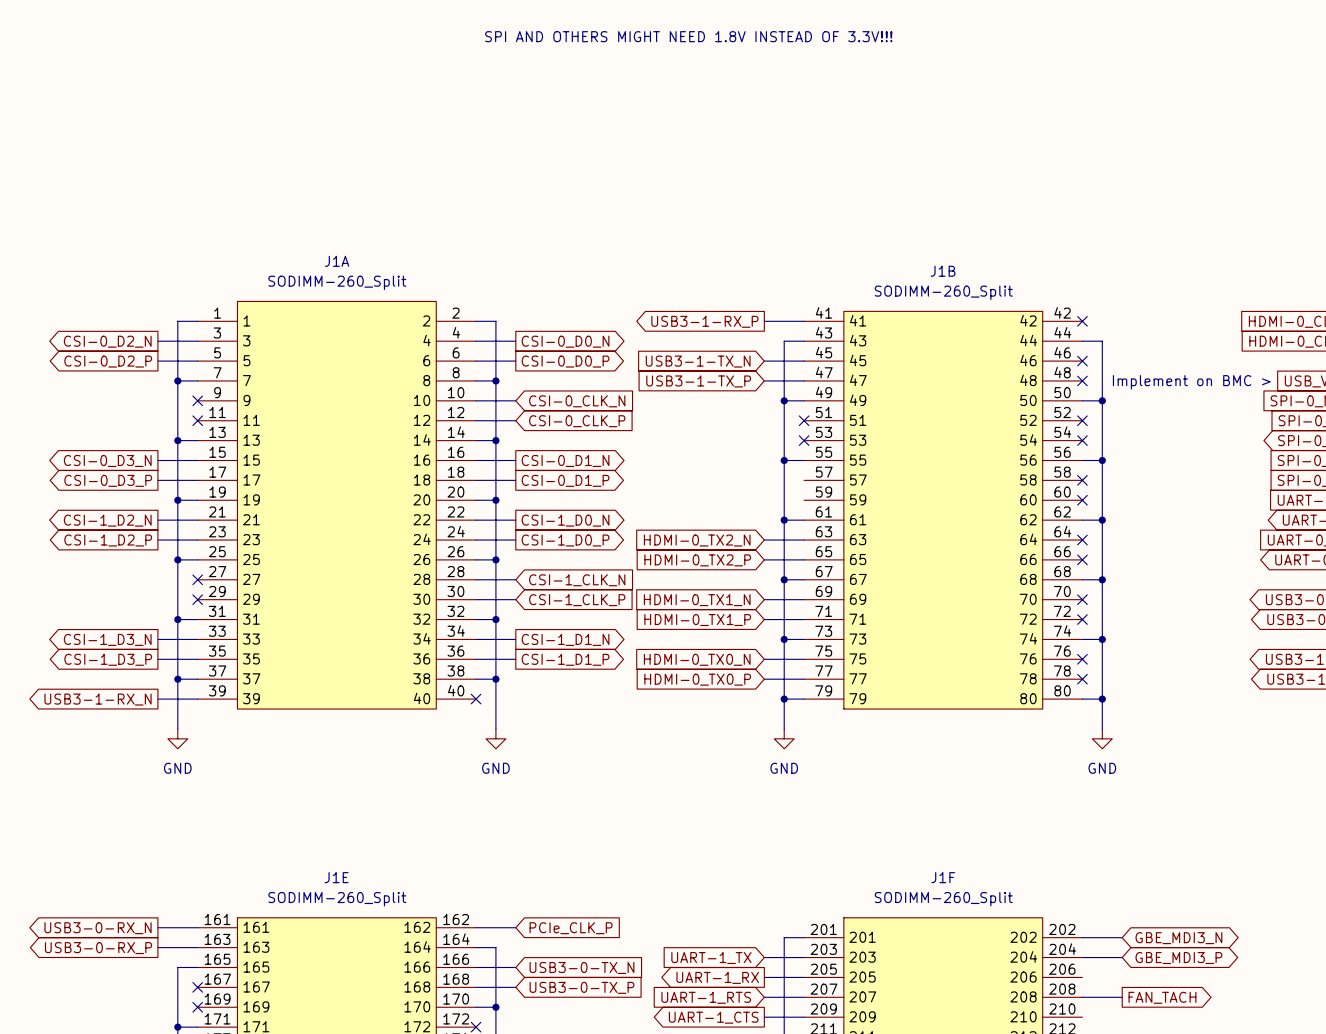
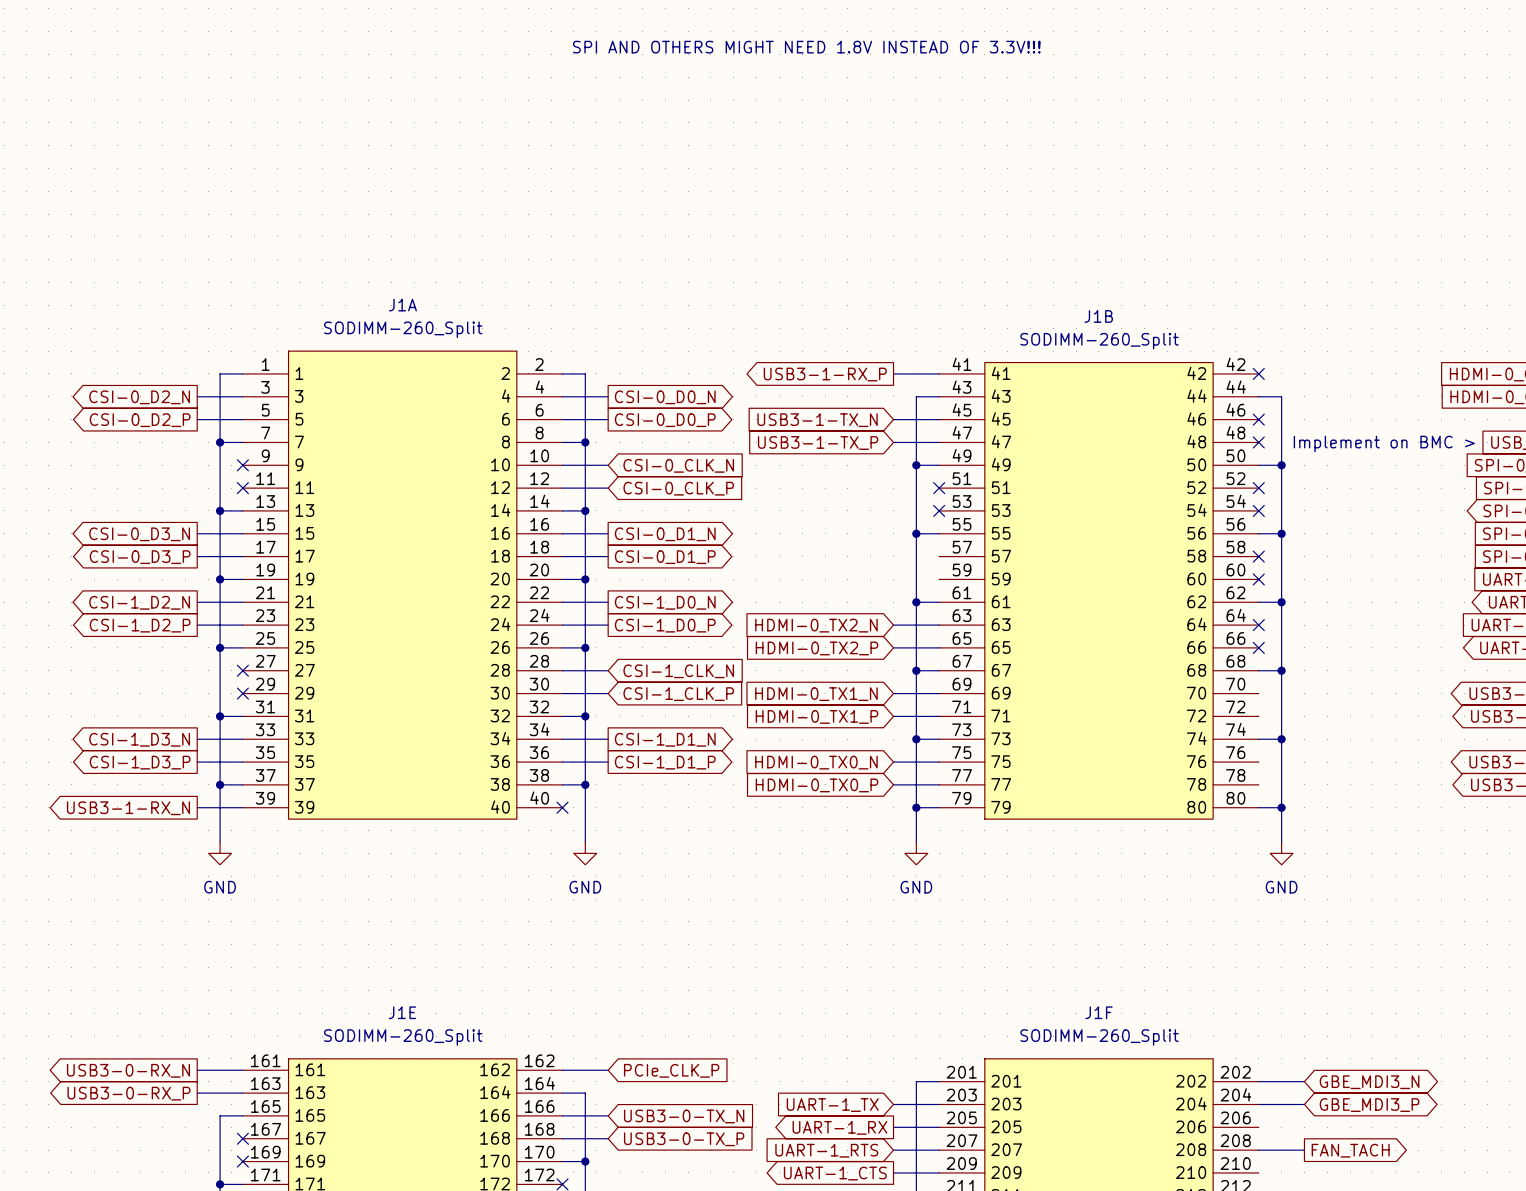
no-connect mark: (1082, 599) -> none
no-connect mark: (1082, 619) -> none
no-connect mark: (1082, 659) -> none
no-connect mark: (1082, 679) -> none

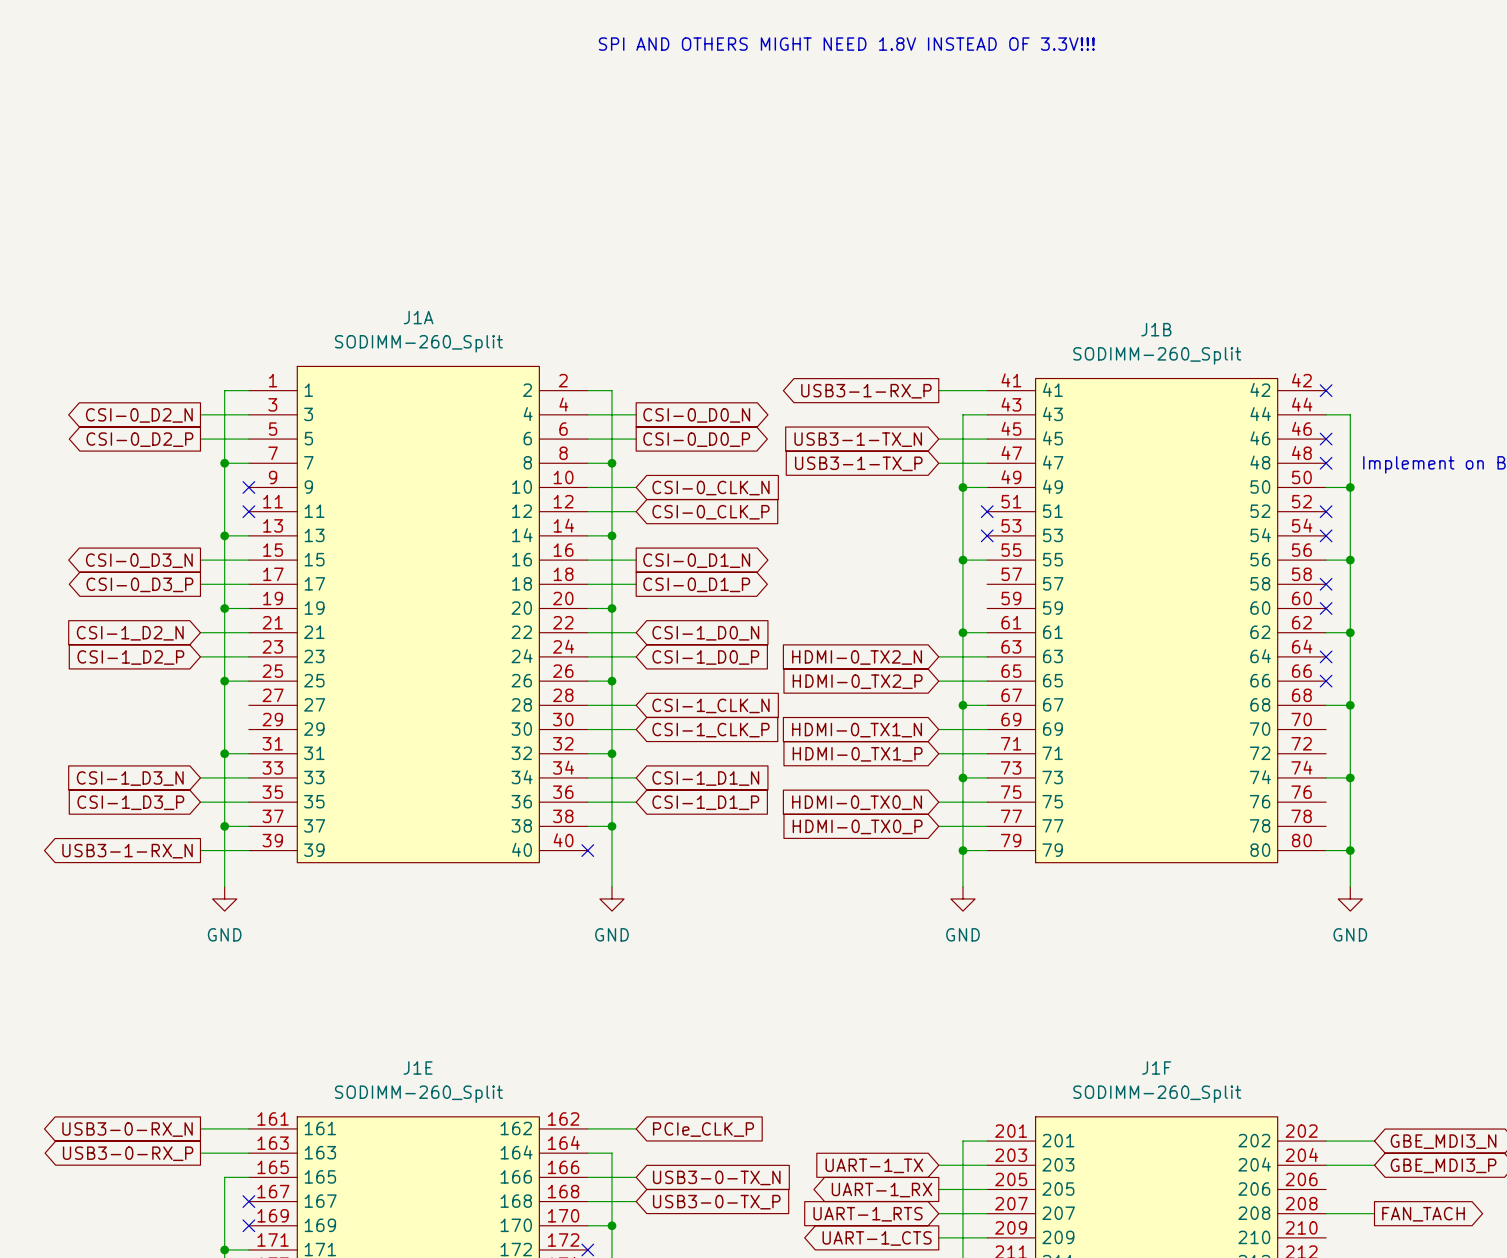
global label shape: output (139, 602) -> input (130, 633)
global label shape: output (665, 602) -> input (705, 633)
global label shape: output (140, 625) -> input (130, 657)
global label shape: output (665, 625) -> input (705, 657)
no-connect mark: (242, 670) -> none
no-connect mark: (242, 693) -> none
global label shape: output (139, 739) -> input (130, 778)
global label shape: output (665, 739) -> input (705, 778)
global label shape: output (140, 762) -> input (130, 802)
global label shape: output (665, 762) -> input (705, 802)

